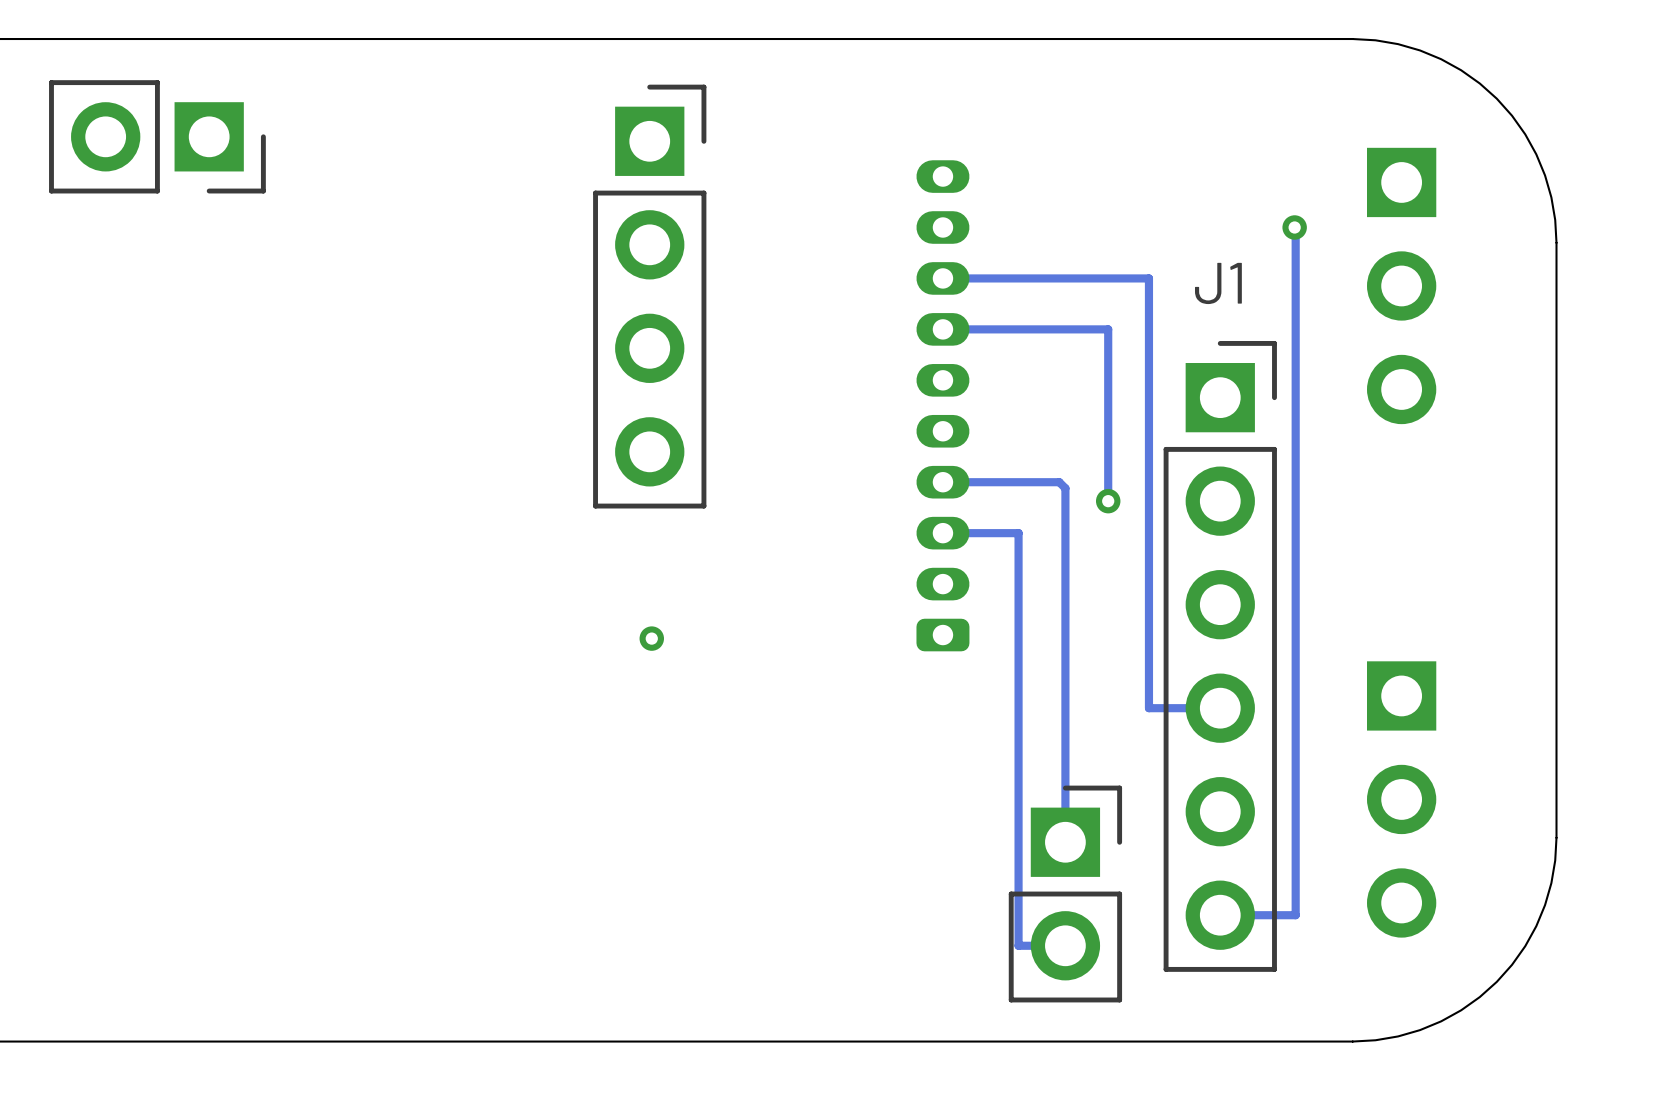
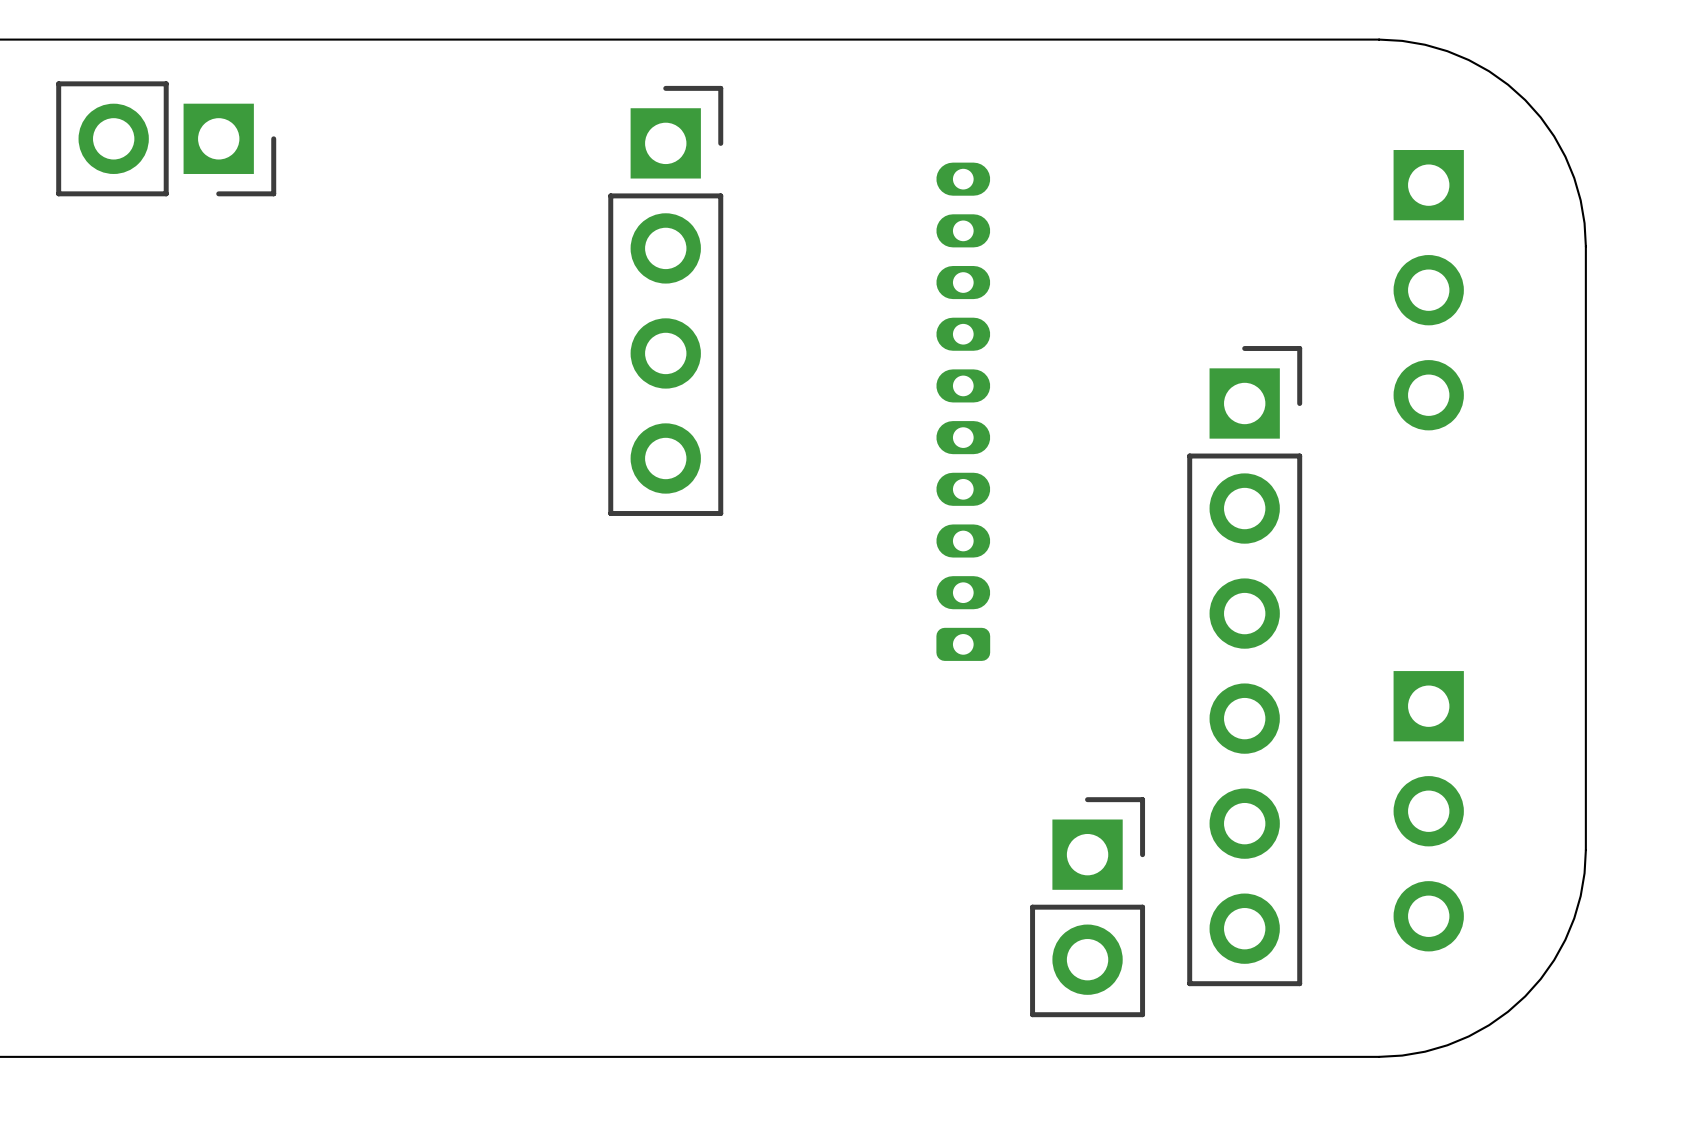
track: (1294, 227) (1295, 915) (1220, 915) -> none
via: (1294, 227) -> none
track: (942, 278) (1148, 278) (1148, 708) (1220, 708) -> none
J1 name: J1 (1218, 283) -> none
track: (942, 329) (1108, 329) (1108, 501) -> none
track: (942, 482) (1059, 482) (1065, 488) (1065, 842) -> none
via: (1108, 501) -> none
track: (942, 533) (1018, 533) (1018, 945) (1065, 945) -> none
via: (651, 638) -> none

